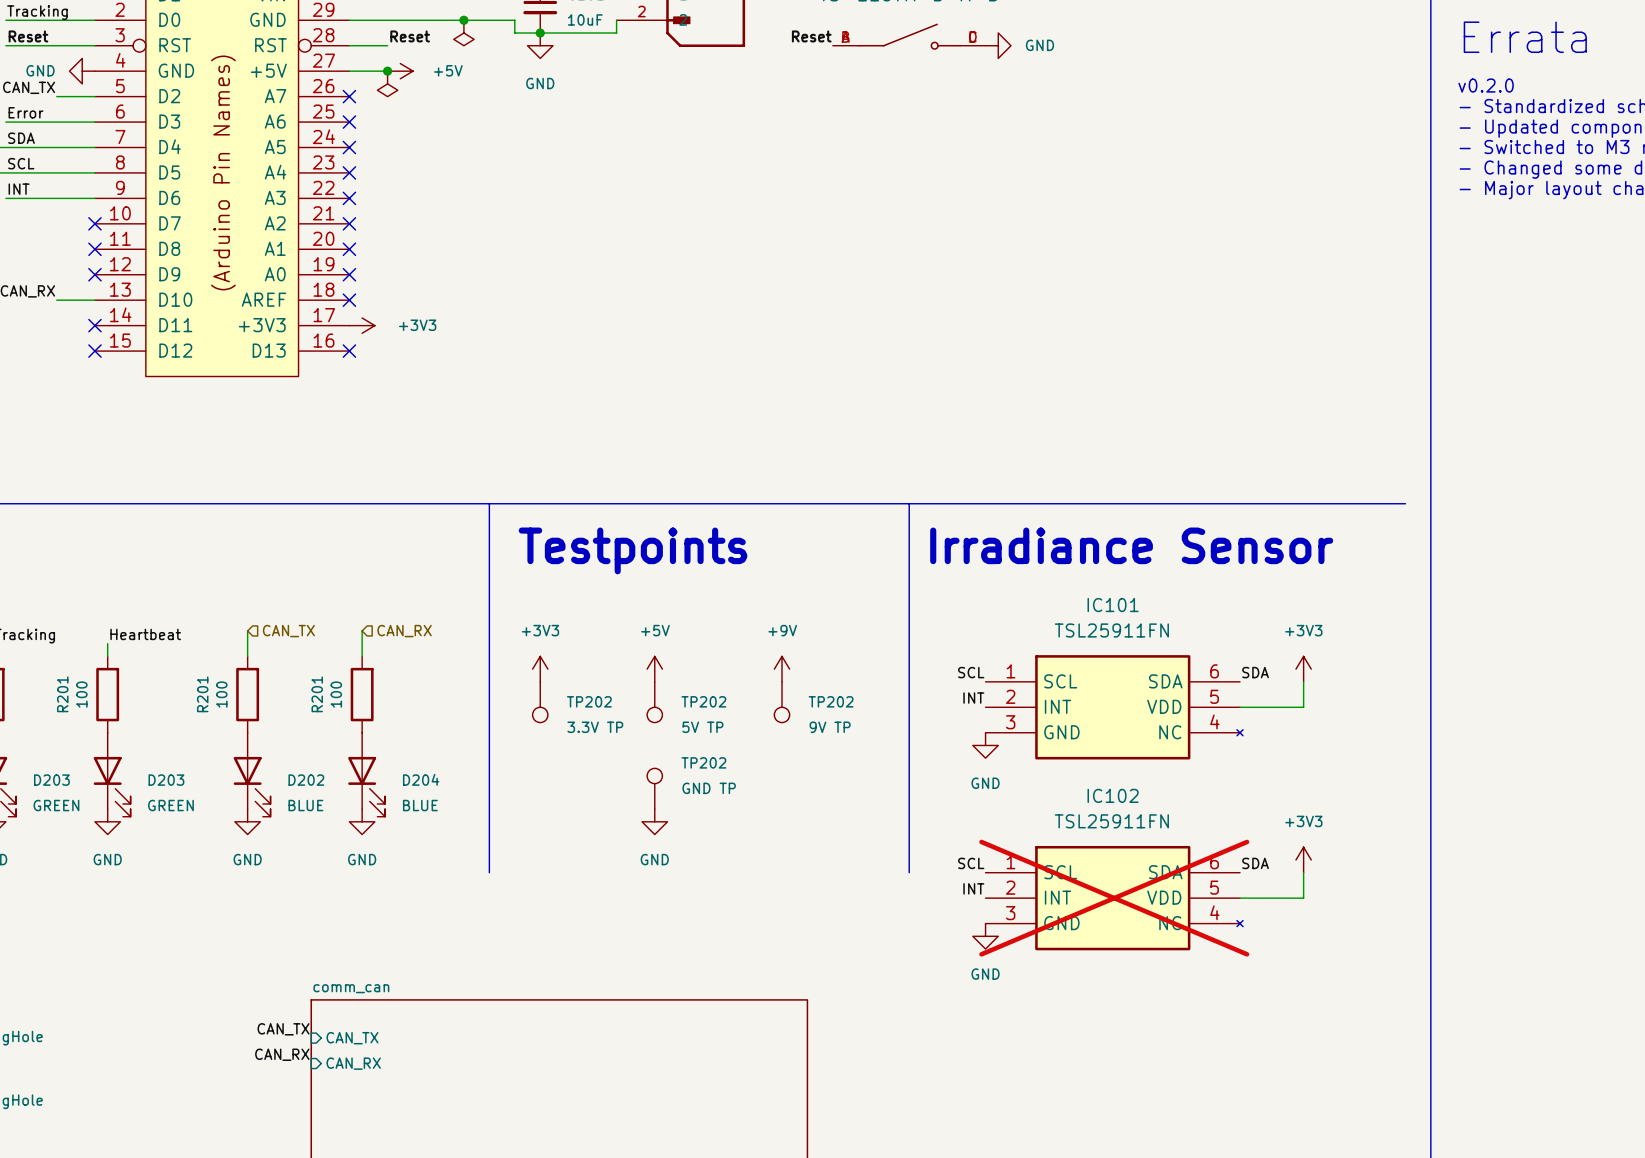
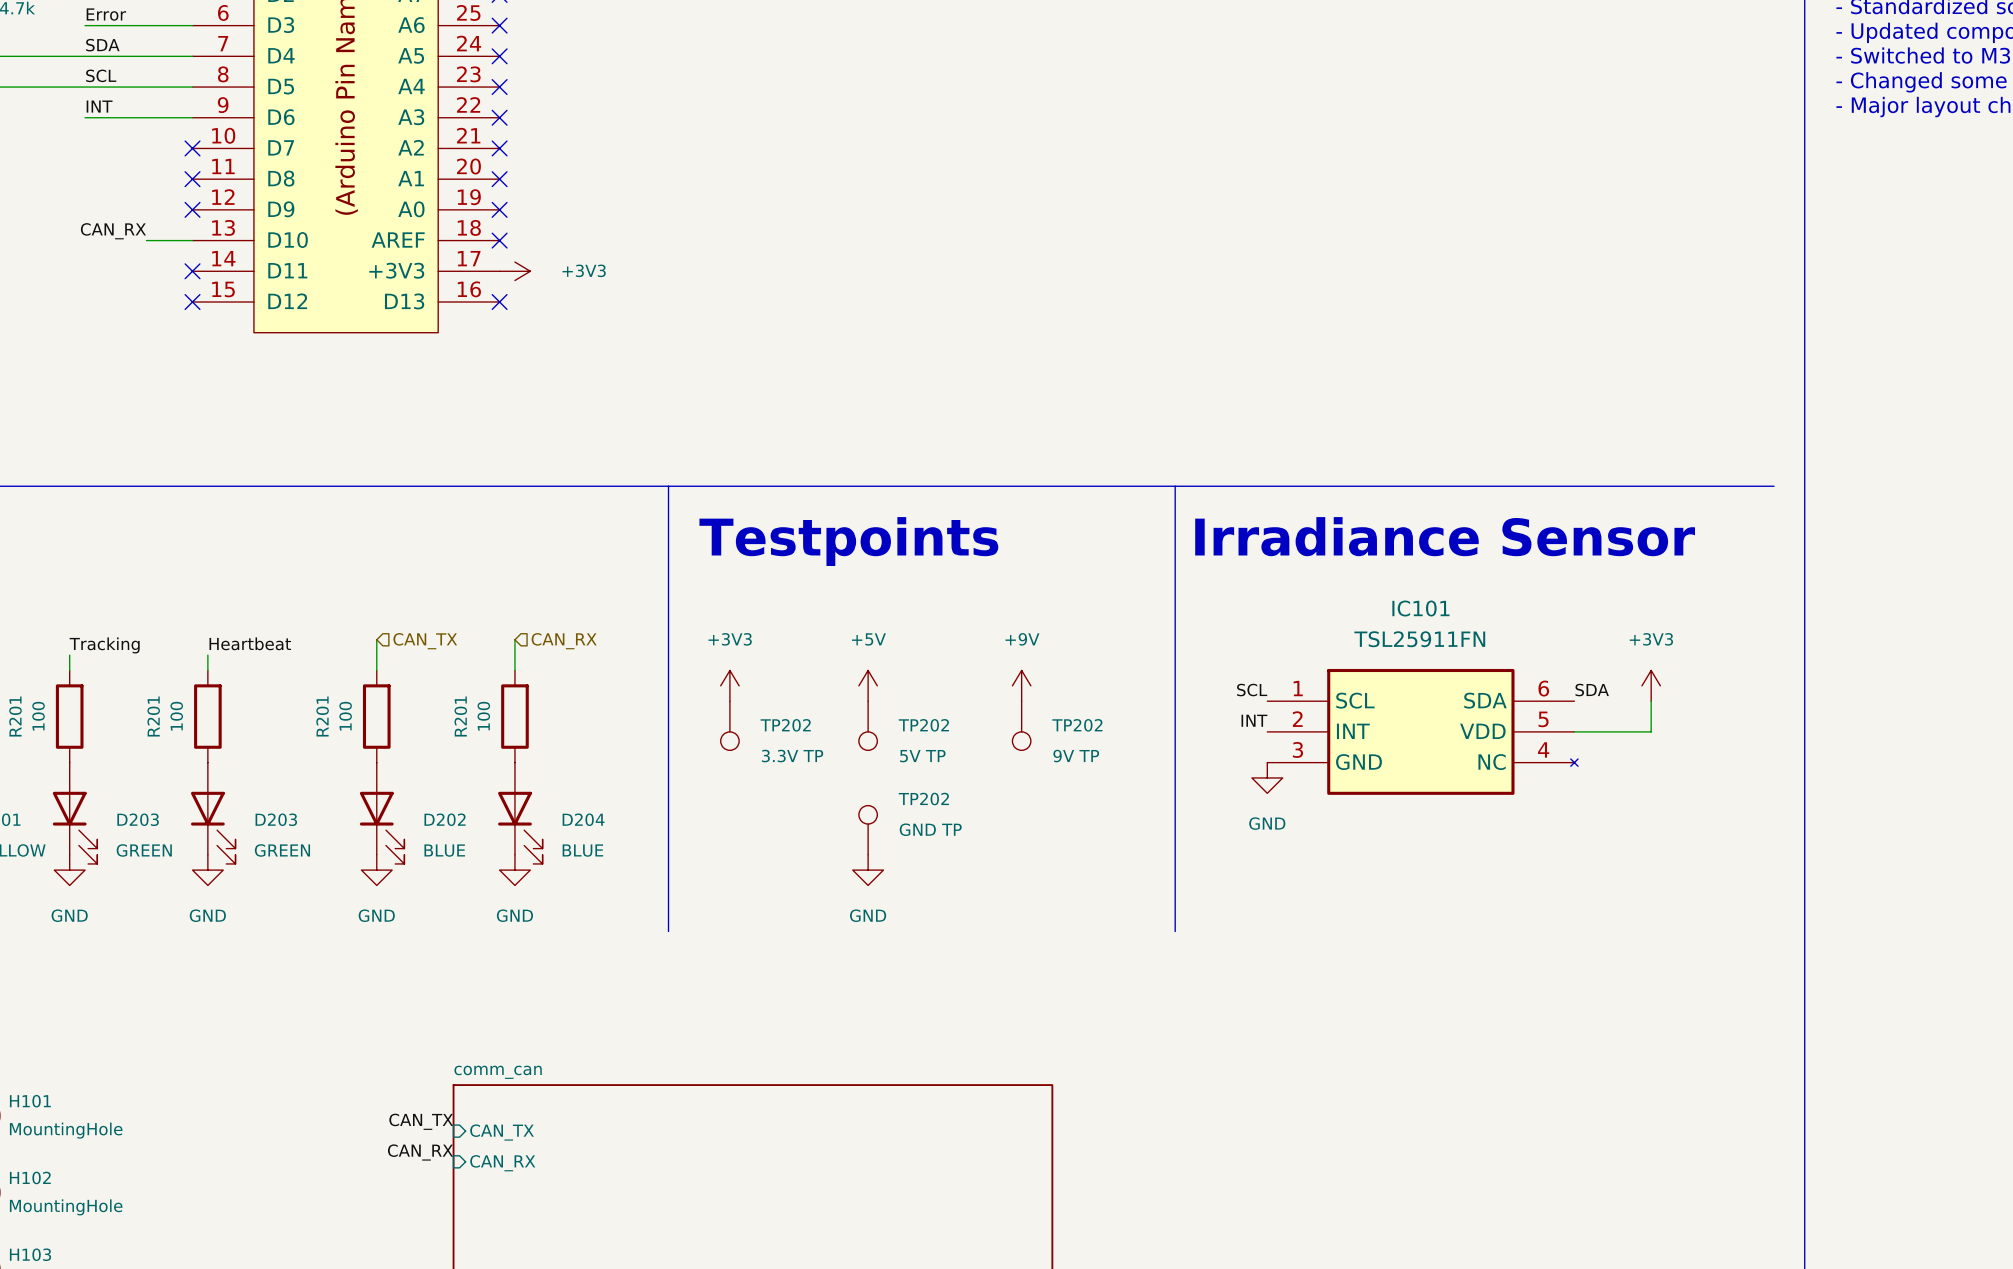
power symbol: +3V3 (1303, 859) -> none
label: SCL (971, 863) -> none
label: SDA (1255, 863) -> none
wire: (1303, 872) (1303, 898) (1240, 898) -> none
label: INT (973, 888) -> none
IC102: TSL25911FN (1114, 898) -> none
power symbol: GND (985, 936) -> none

